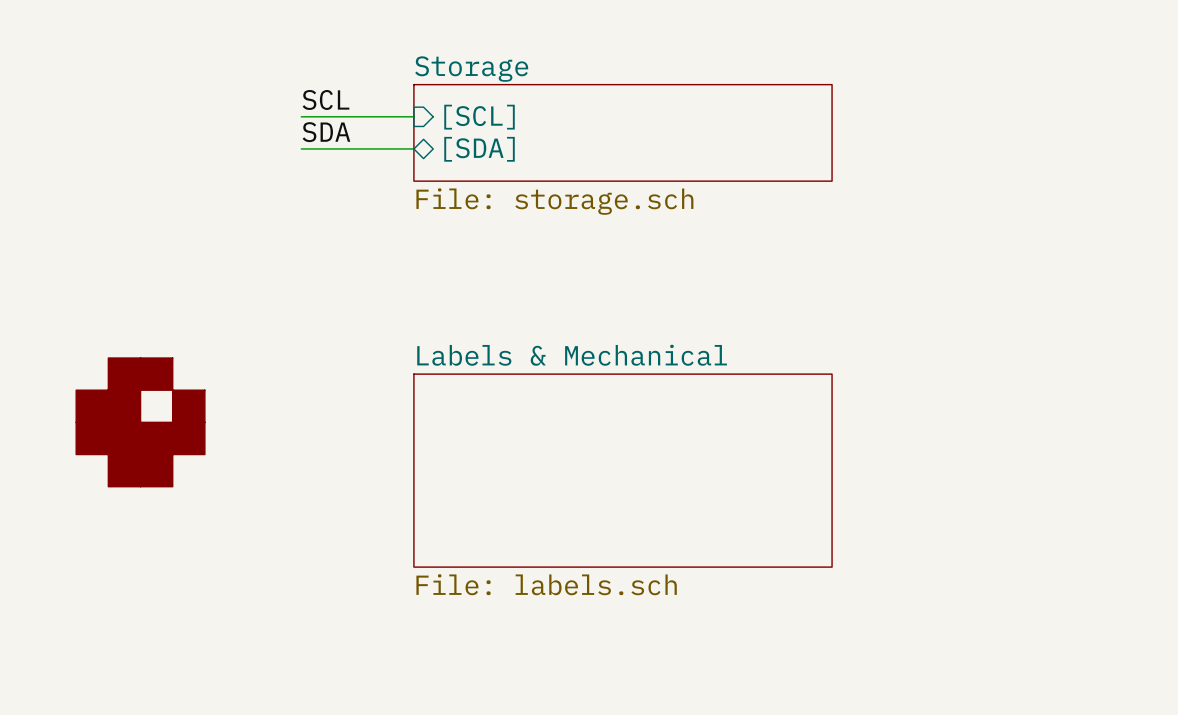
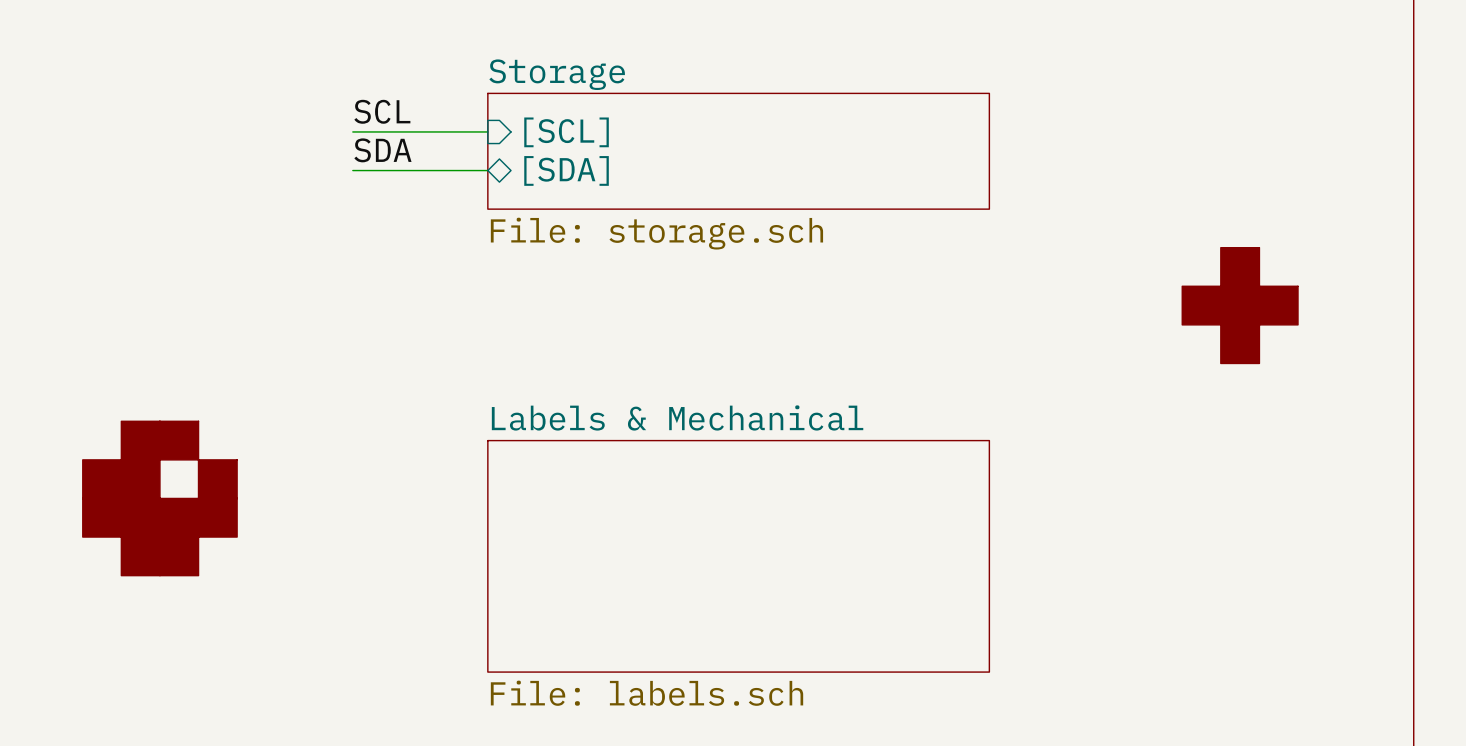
power symbol: none -> (1240, 267)
power symbol: none -> (1201, 305)
power symbol: none -> (1240, 305)
power symbol: none -> (1278, 305)
power symbol: none -> (1240, 344)

